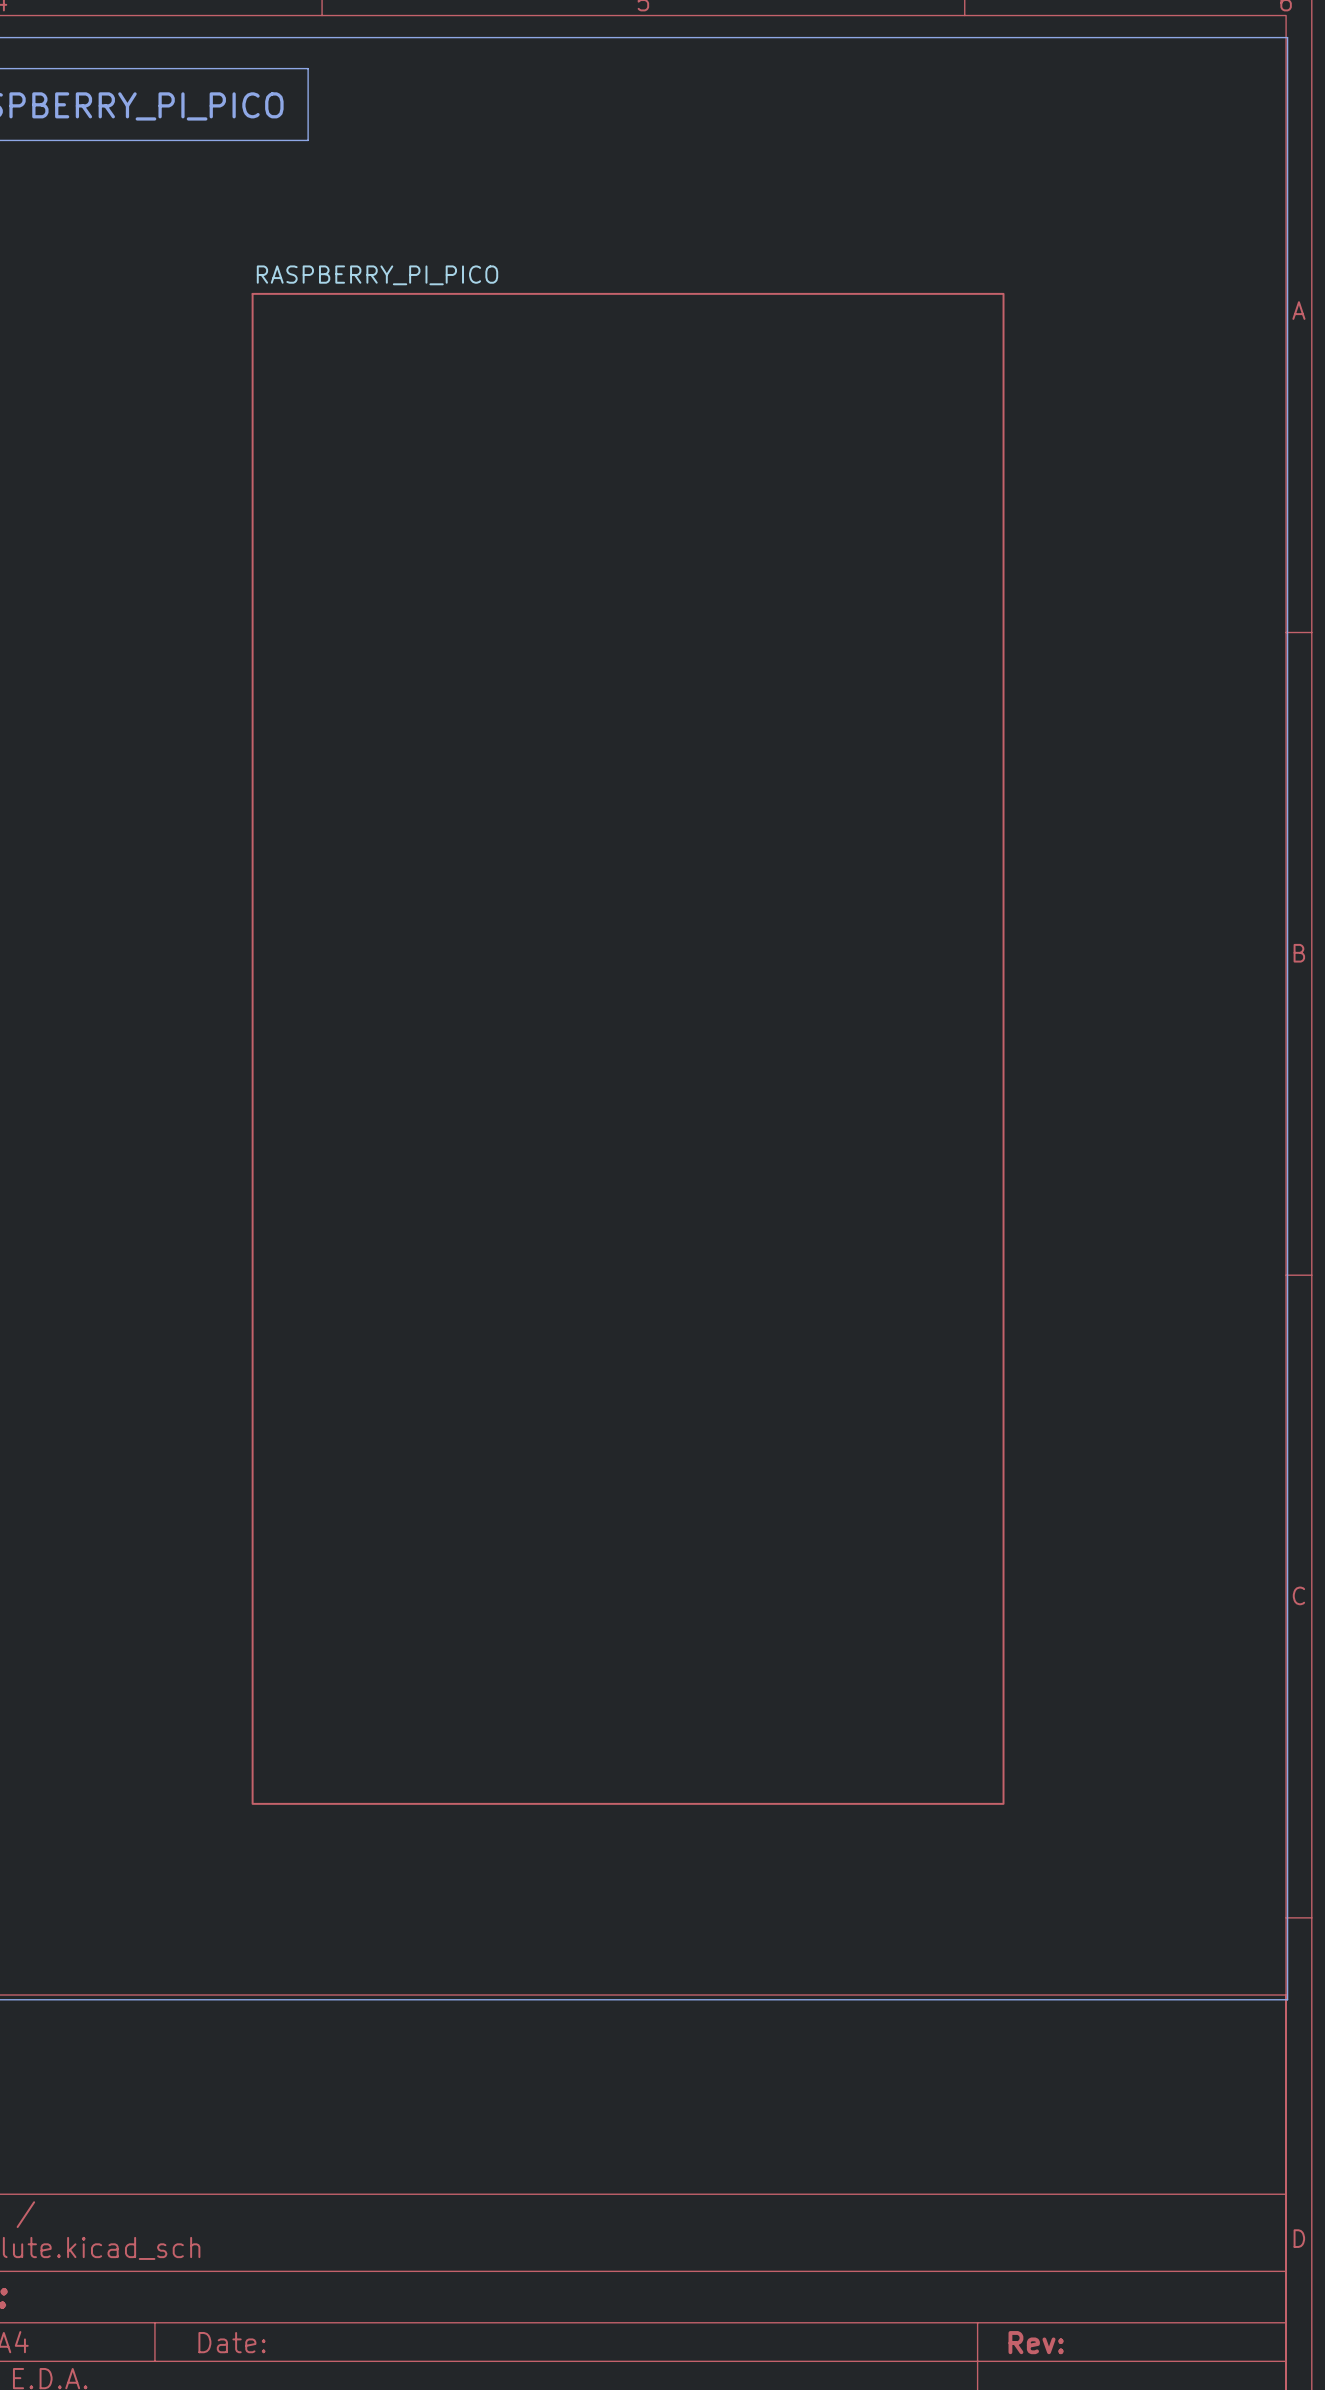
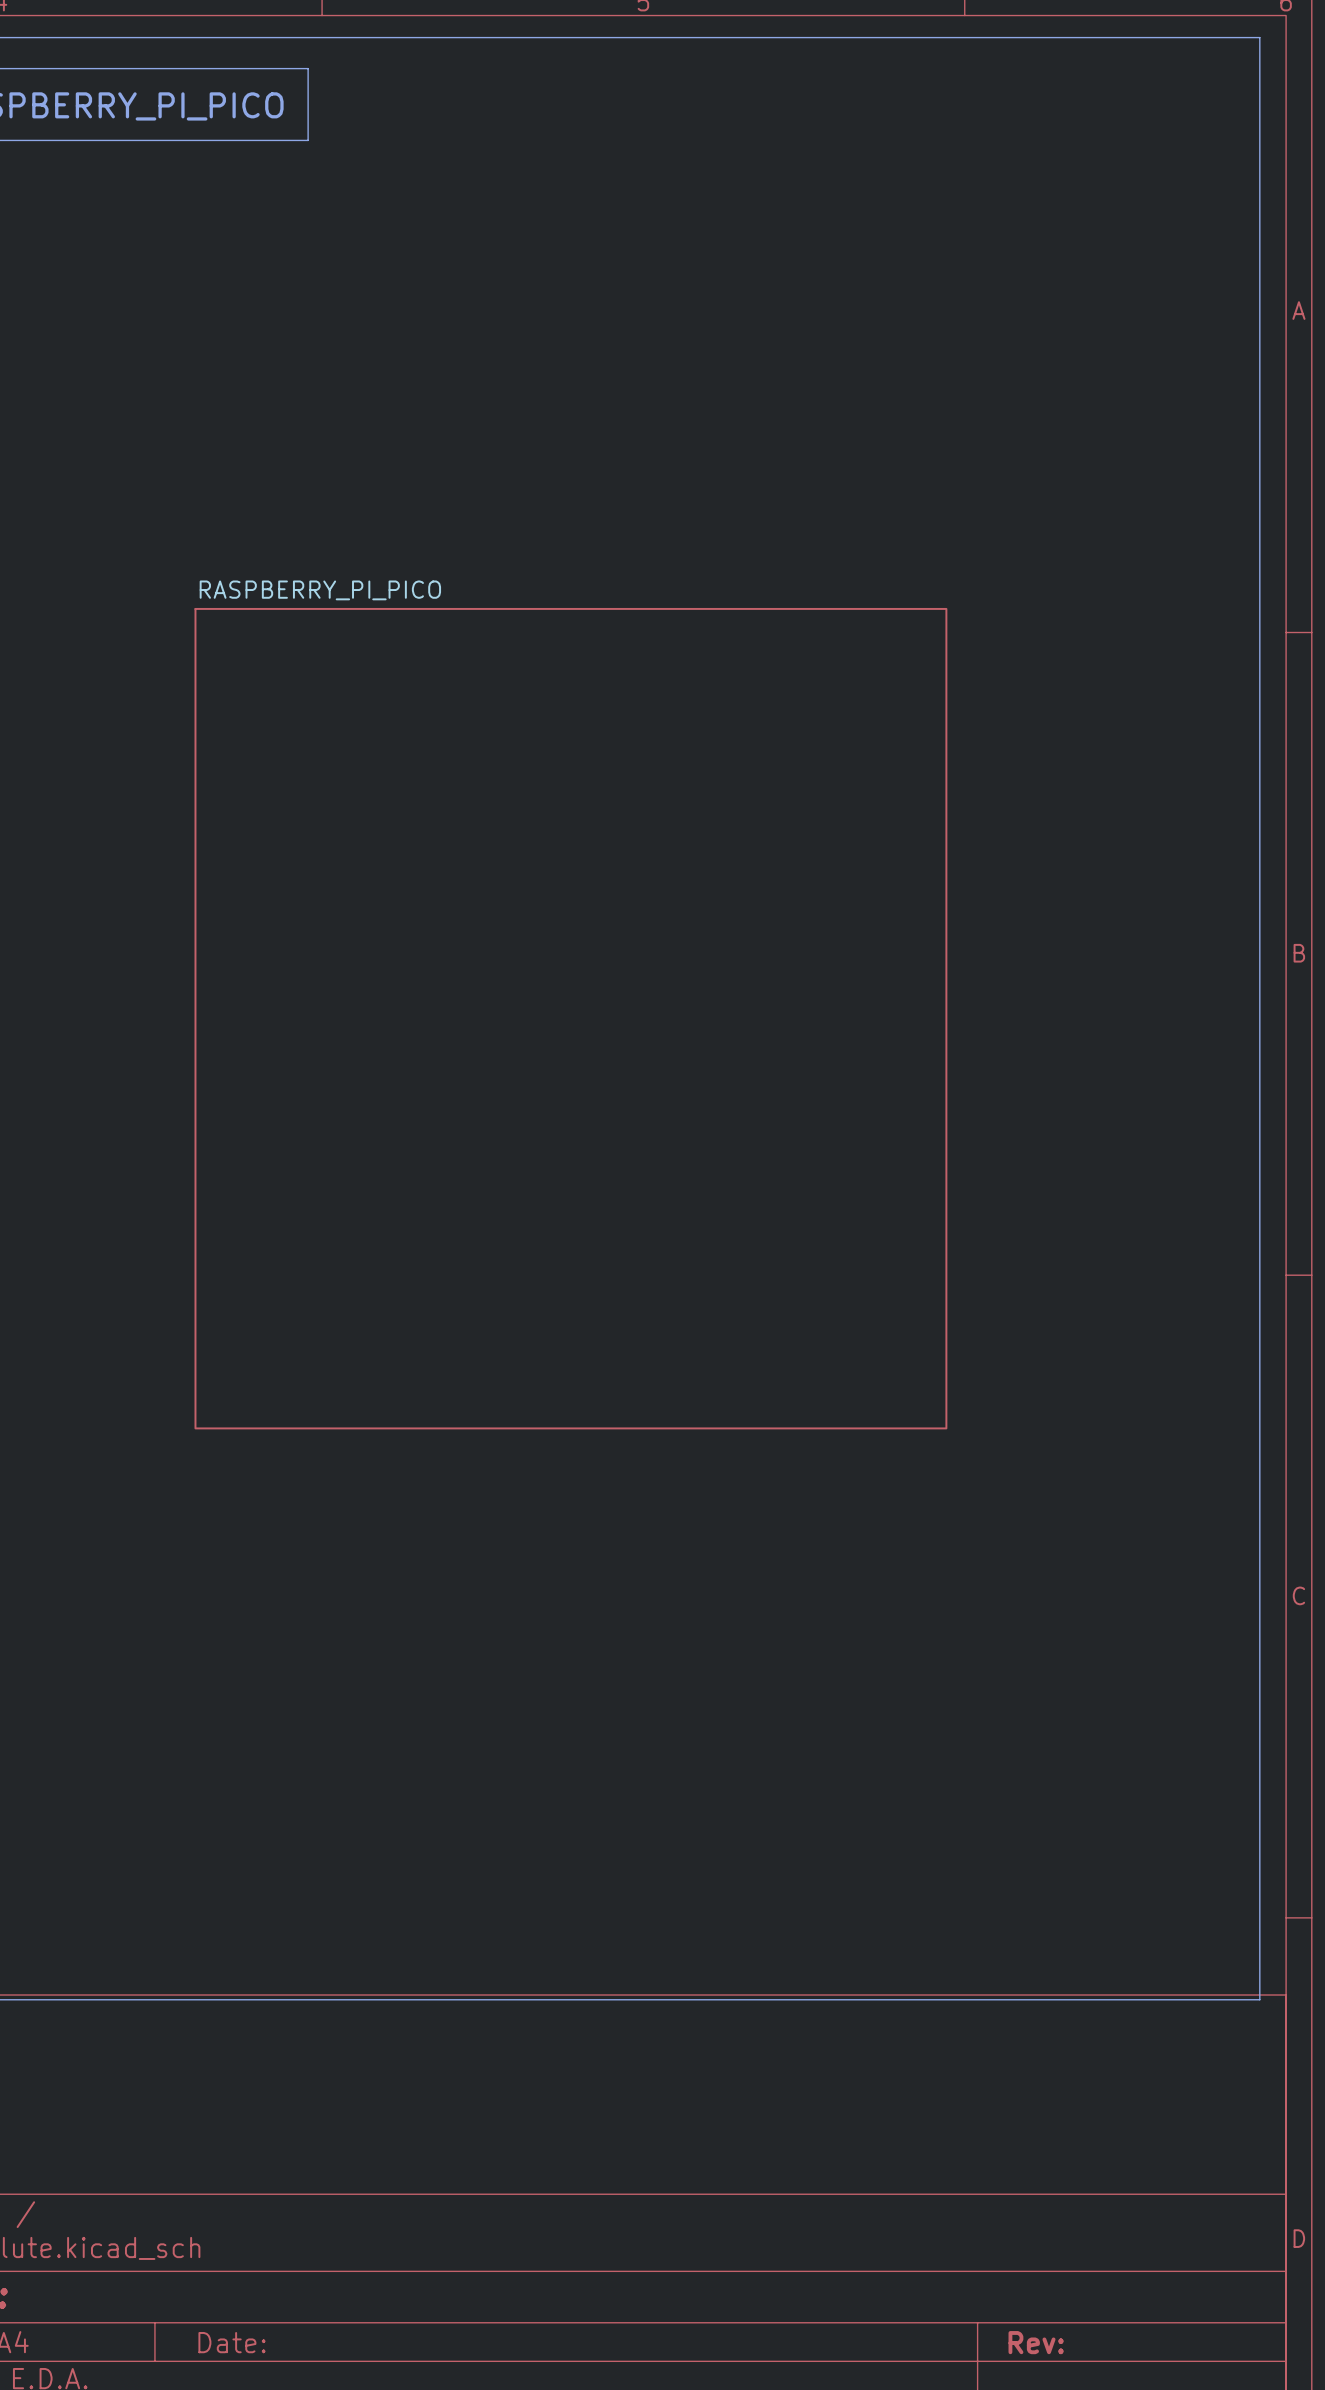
line: (1259, 37) (1287, 37) (1287, 1999) (1259, 1999) -> (1259, 37) (1259, 1999)
sheet RASPBERRY_PI_PICO: none -> (570, 1018)
sheet RASPBERRY_PI_PICO: (628, 1048) -> none

